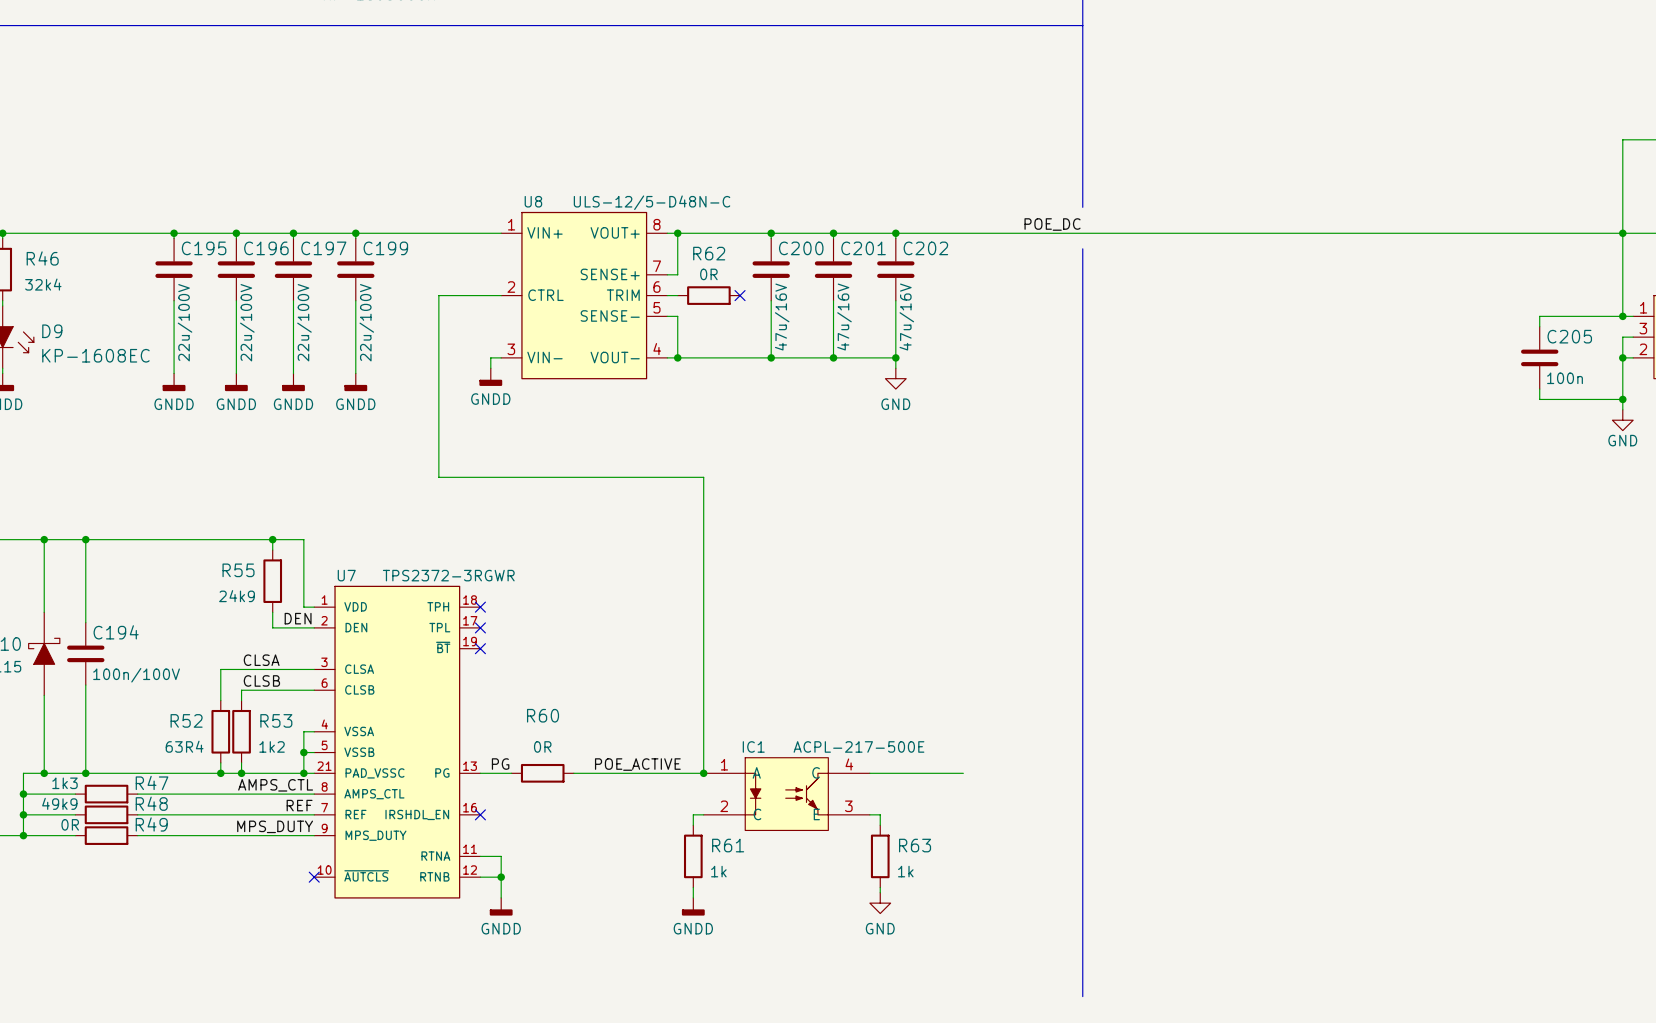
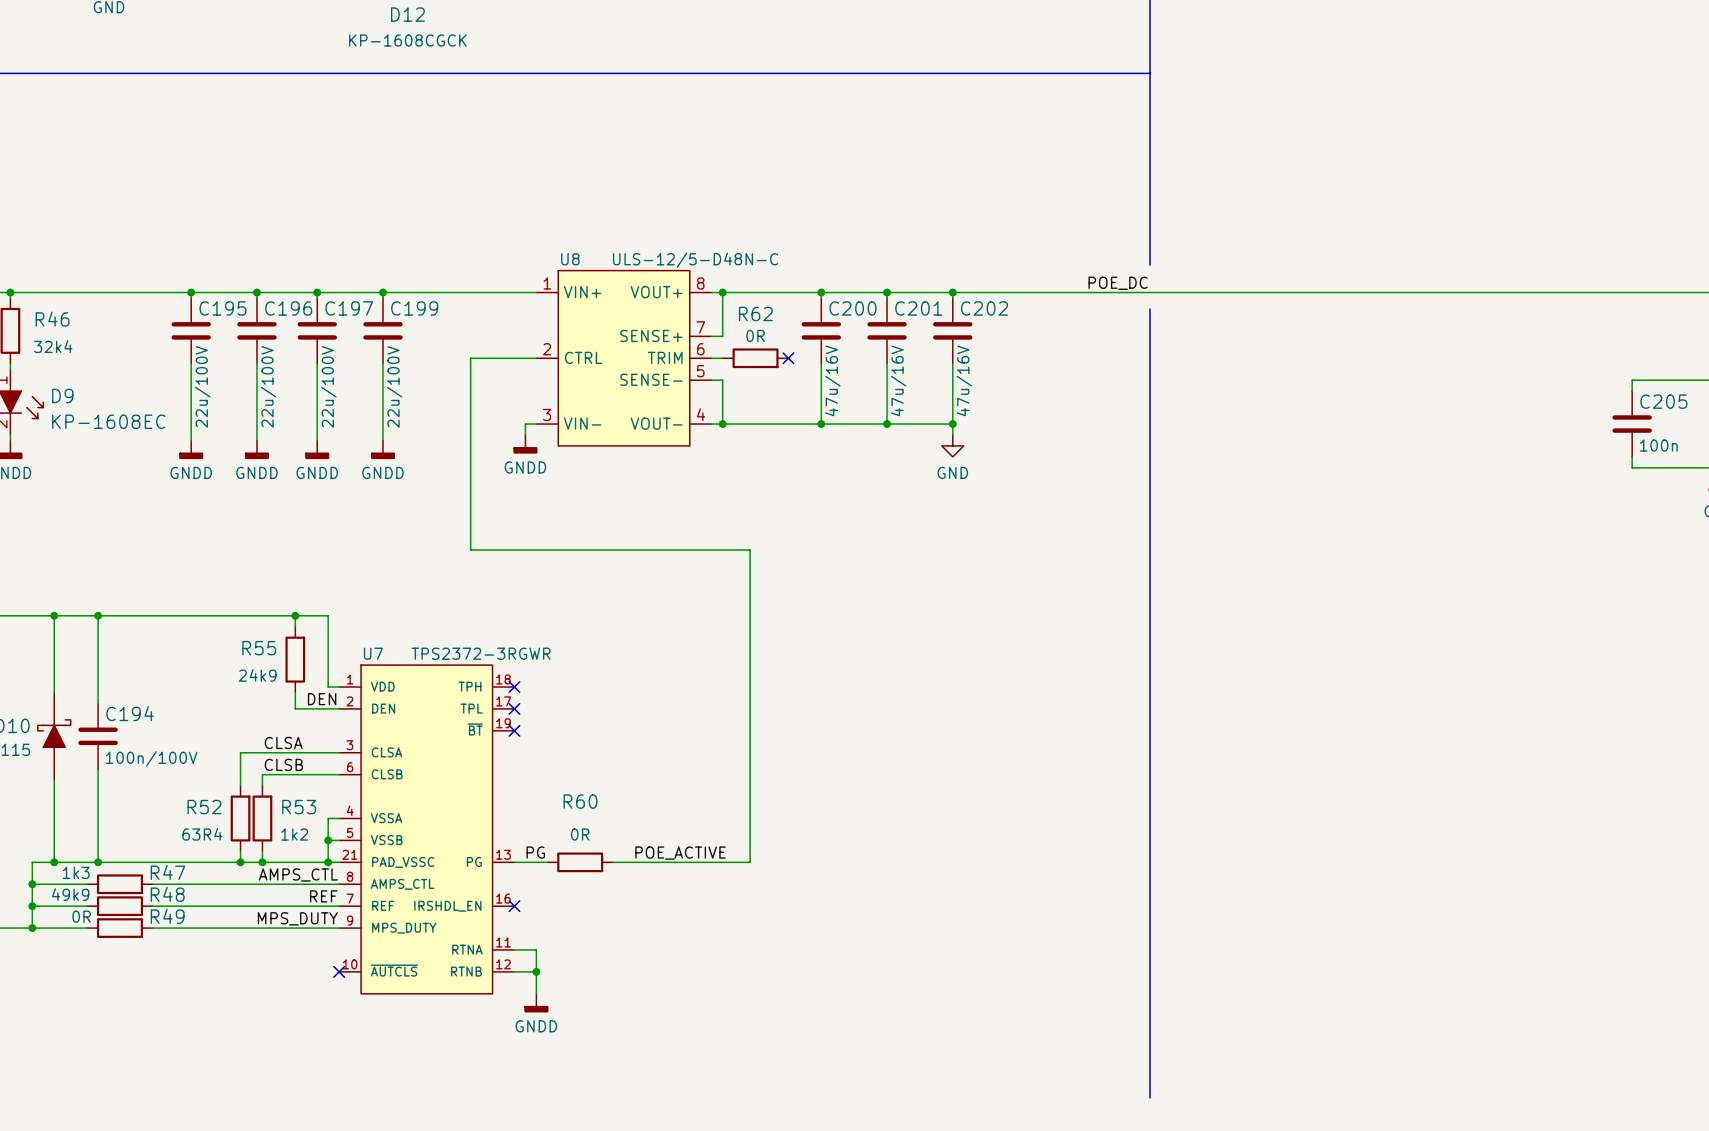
junction: (703, 773) -> none
wire: (869, 773) (963, 773) -> none
IC1: ACPL-217-500E (786, 794) -> none
wire: (703, 814) (693, 814) (693, 825) -> none
wire: (869, 814) (880, 814) (880, 825) -> none
R61: (693, 856) -> none
R63: (880, 856) -> none
wire: (693, 887) (693, 897) -> none
wire: (880, 887) (880, 892) -> none
power symbol: GND (880, 903) -> none
power symbol: GNDD (693, 906) -> none

